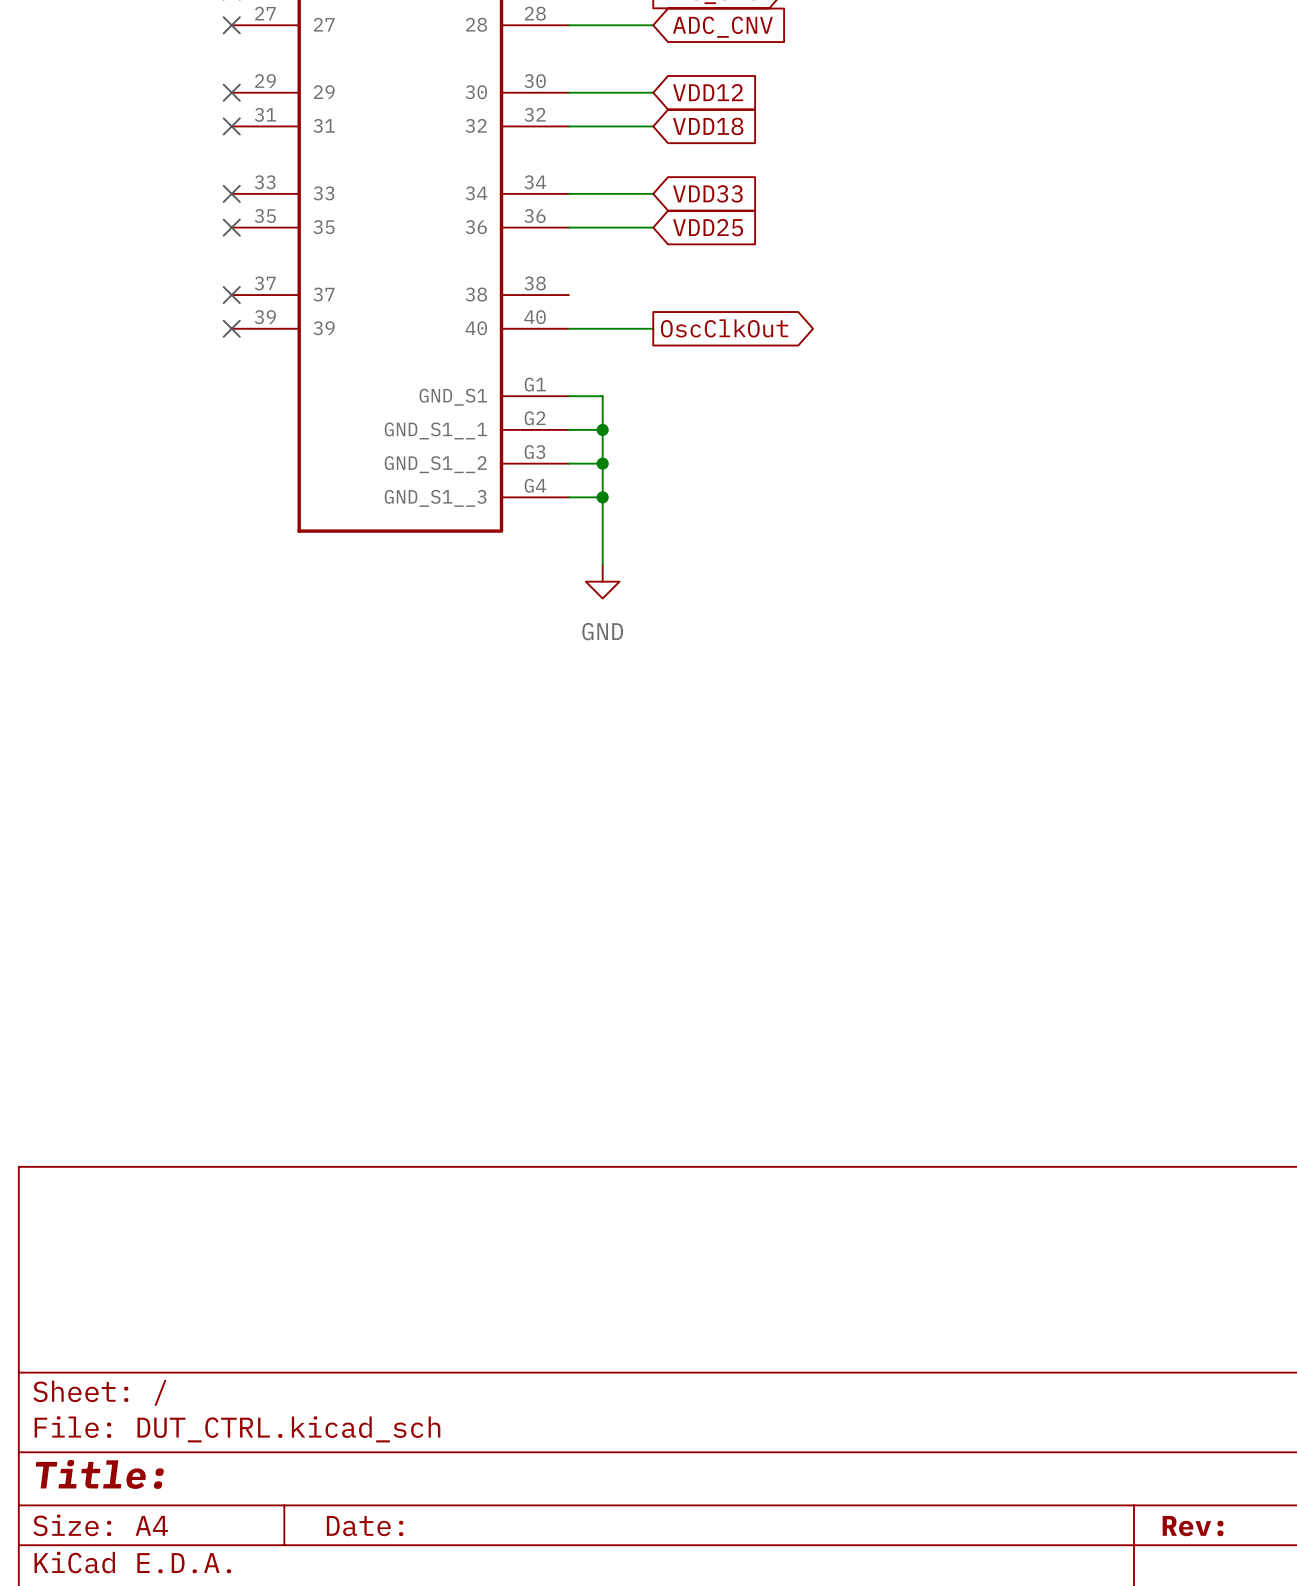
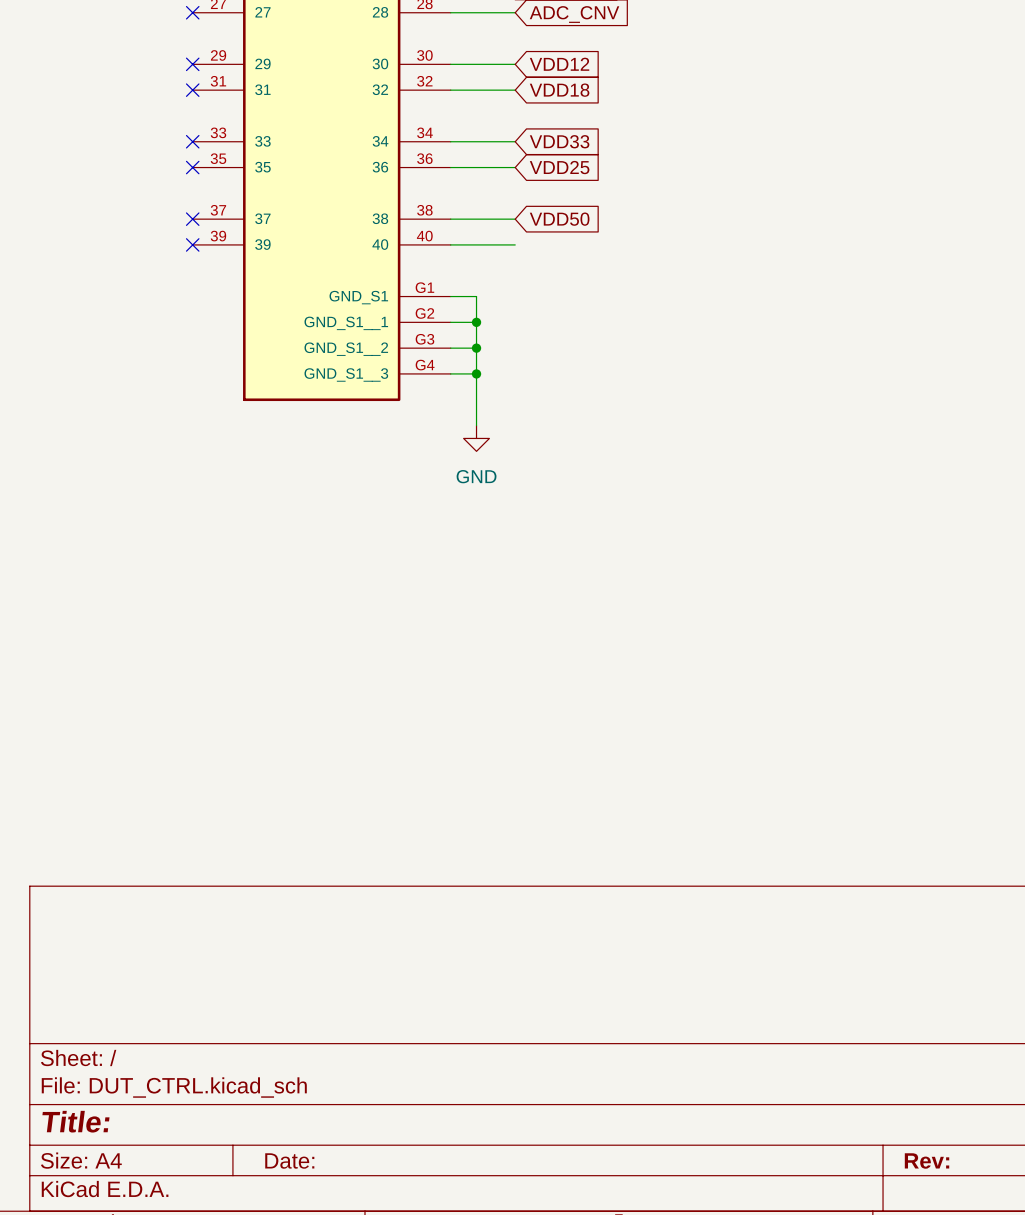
wire: none -> (450, 219) (515, 219)
global label: none -> VDD50 (559, 219)
global label: OscClkOut (724, 328) -> none

